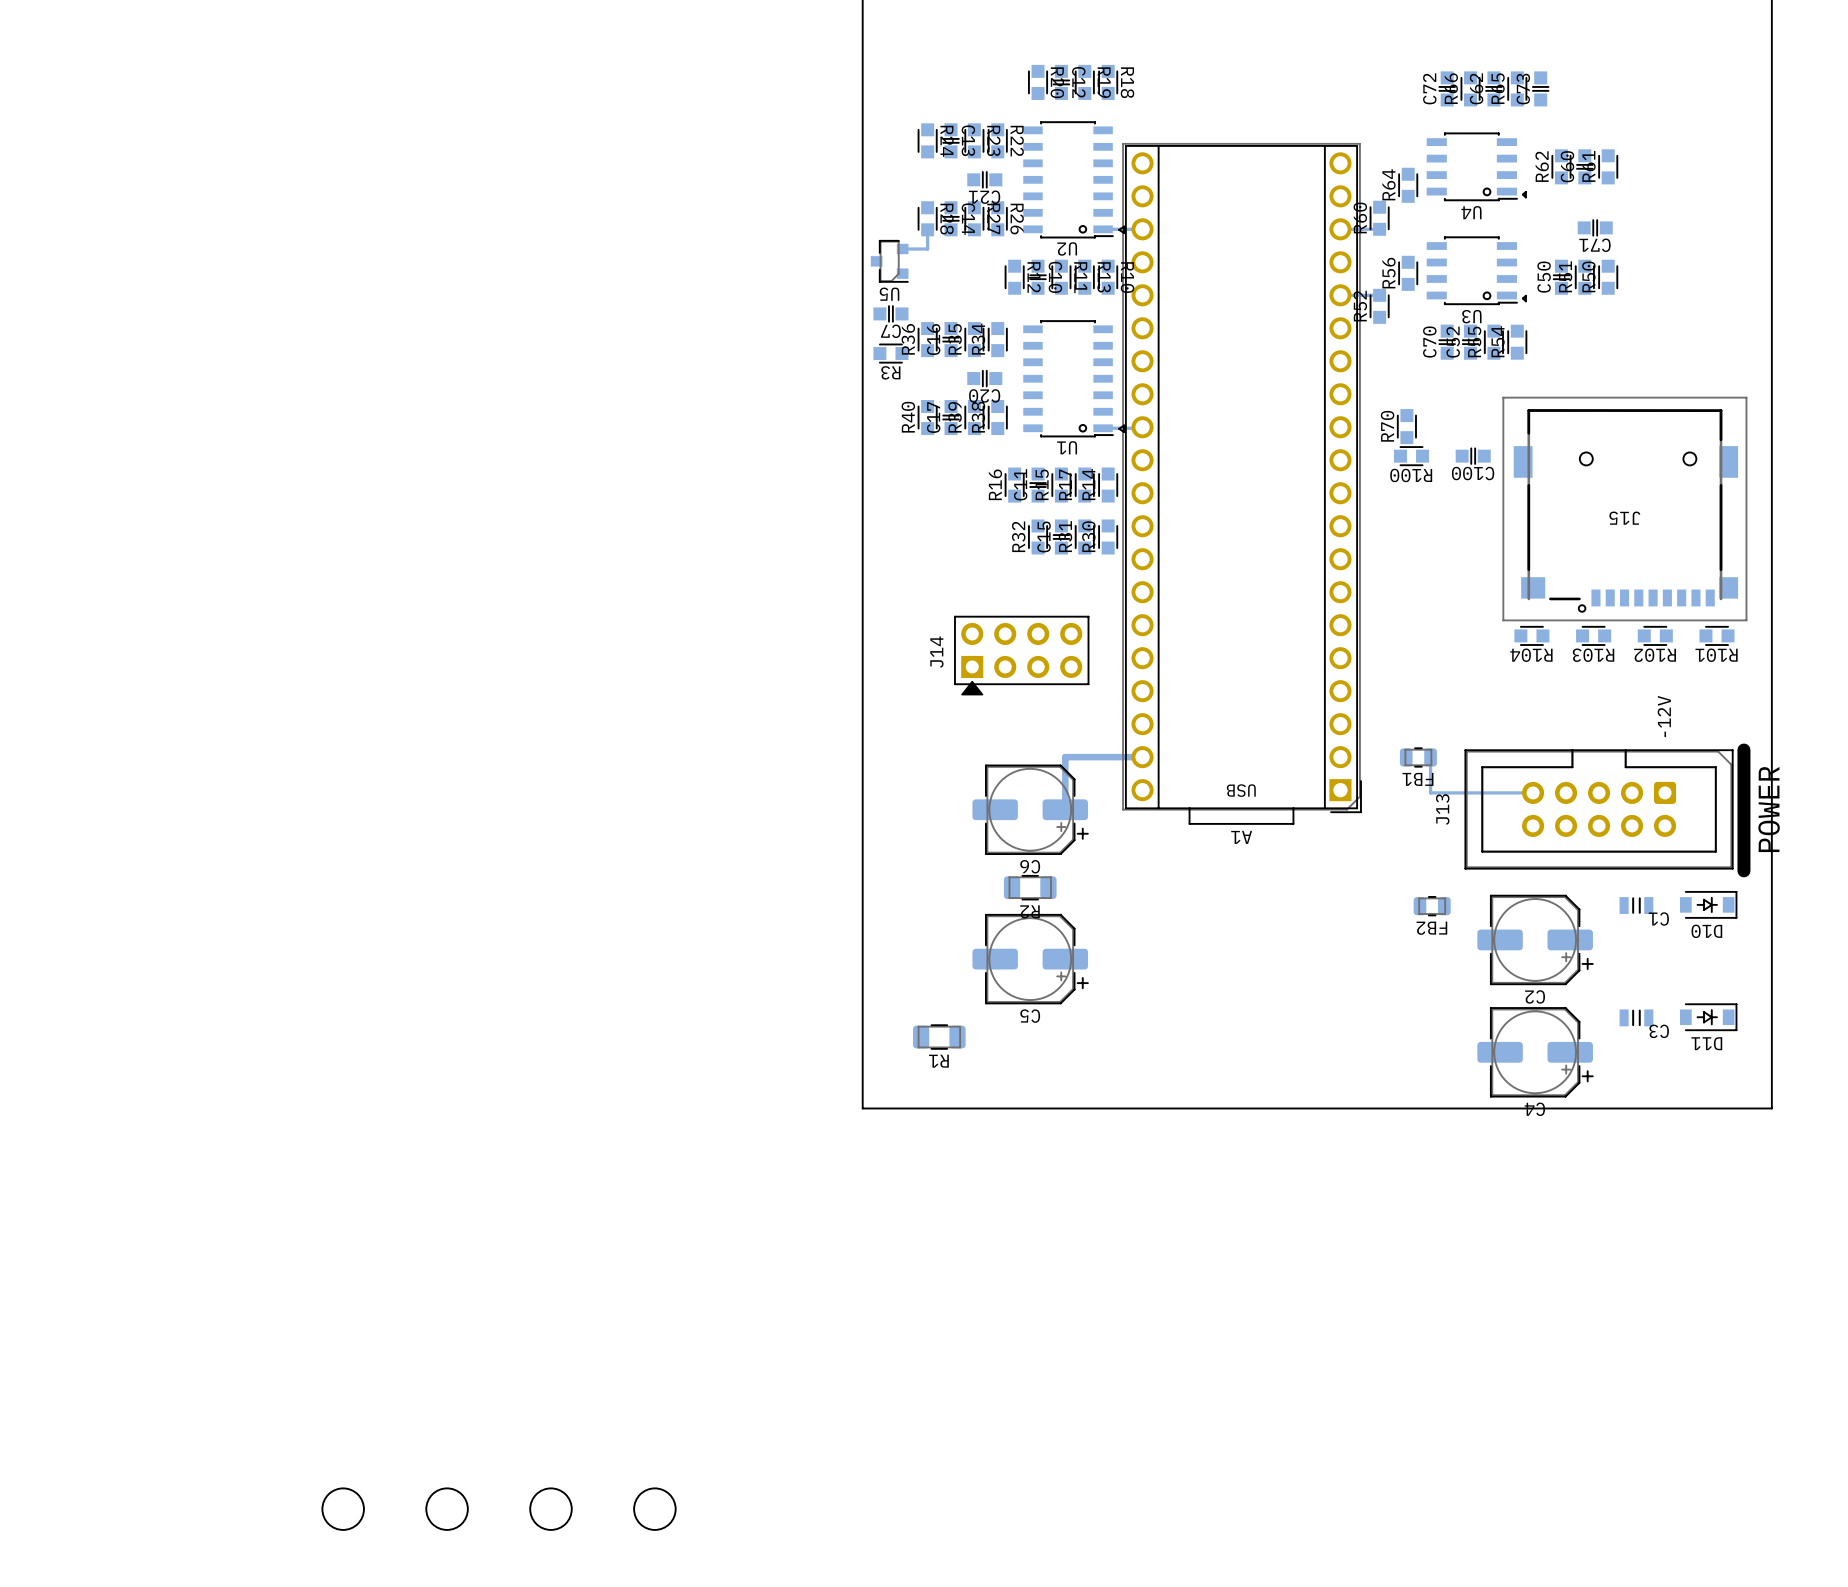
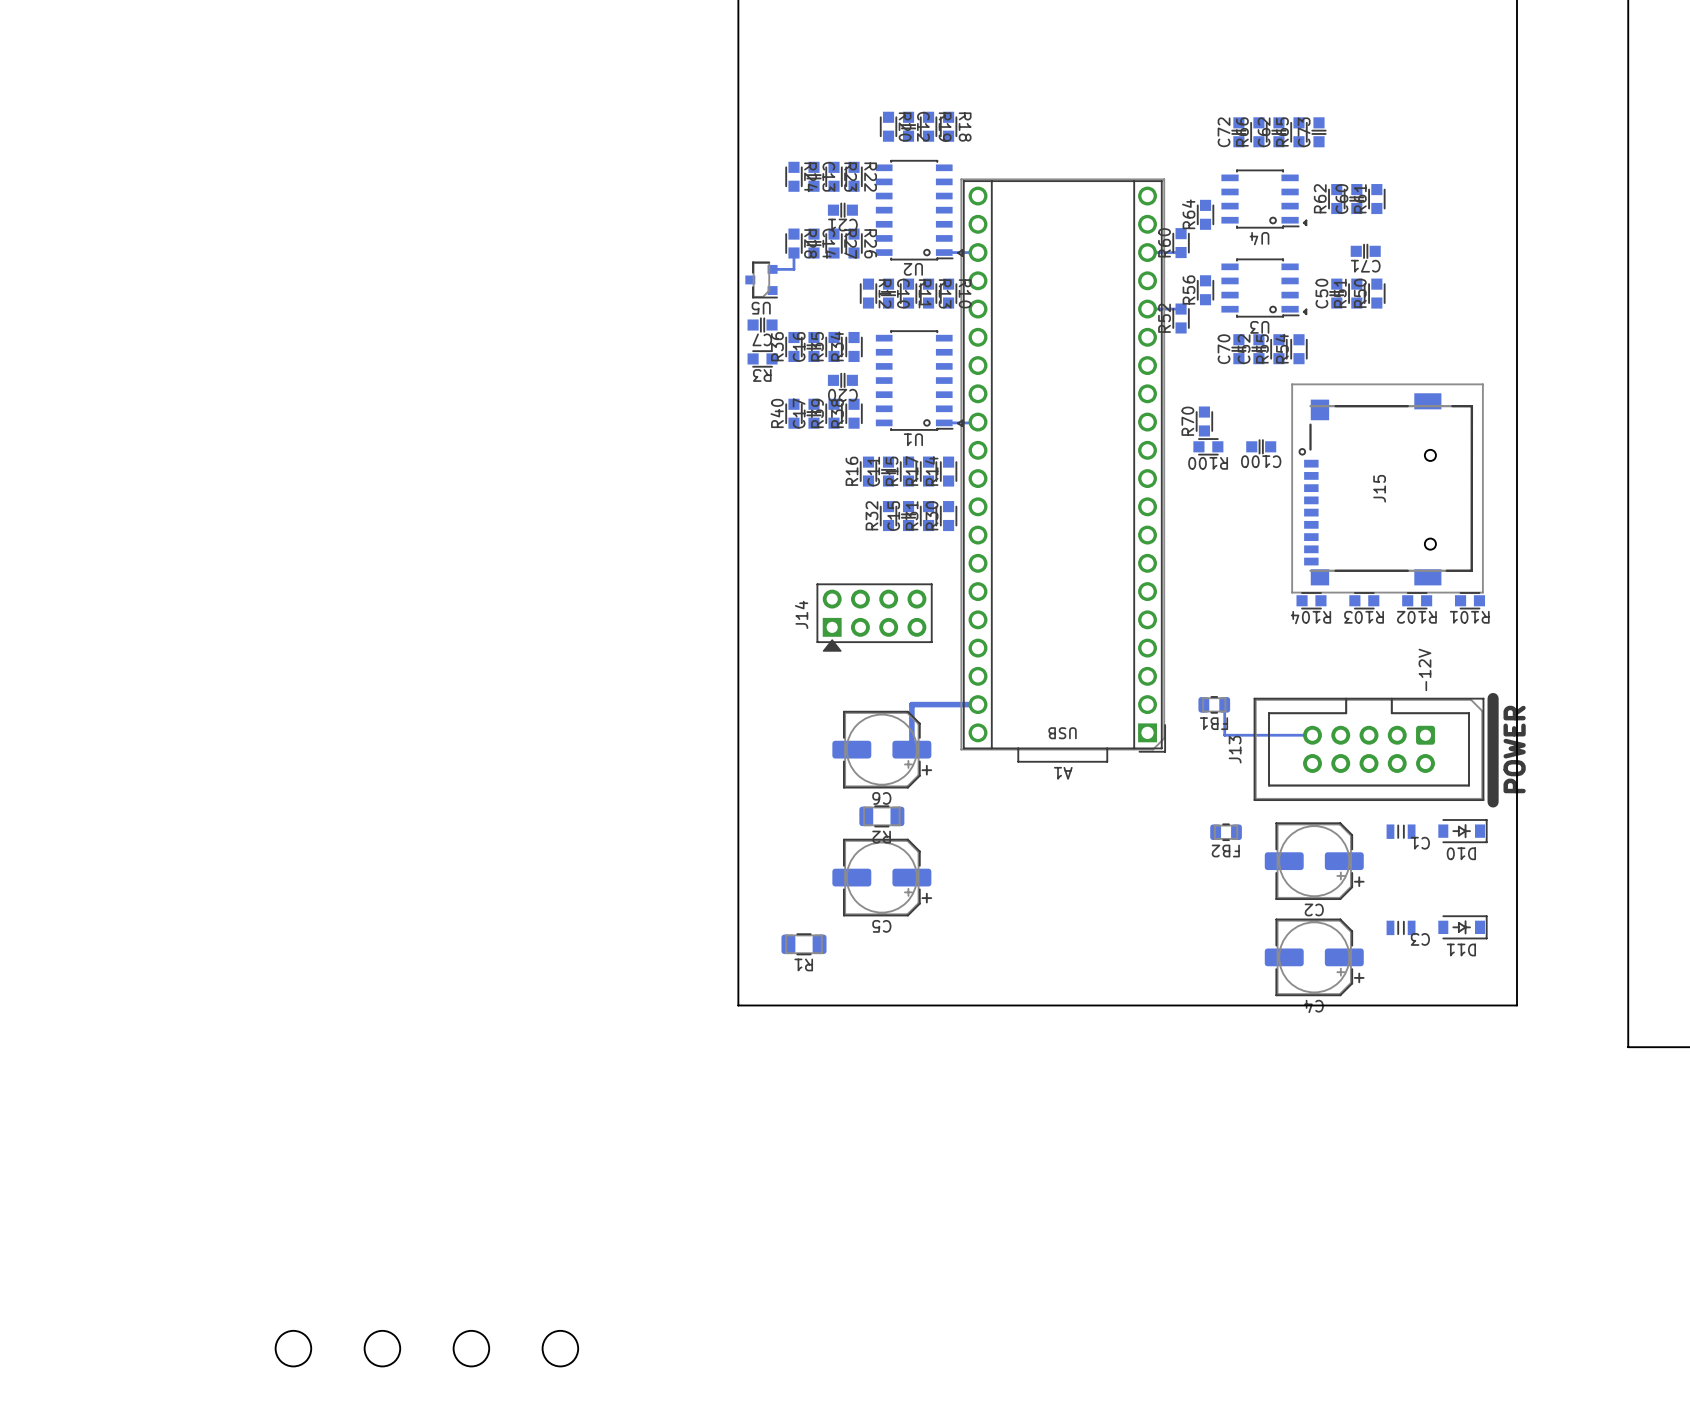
J15 rotation: 0° (1624, 509) -> 90° clockwise (1387, 488)

